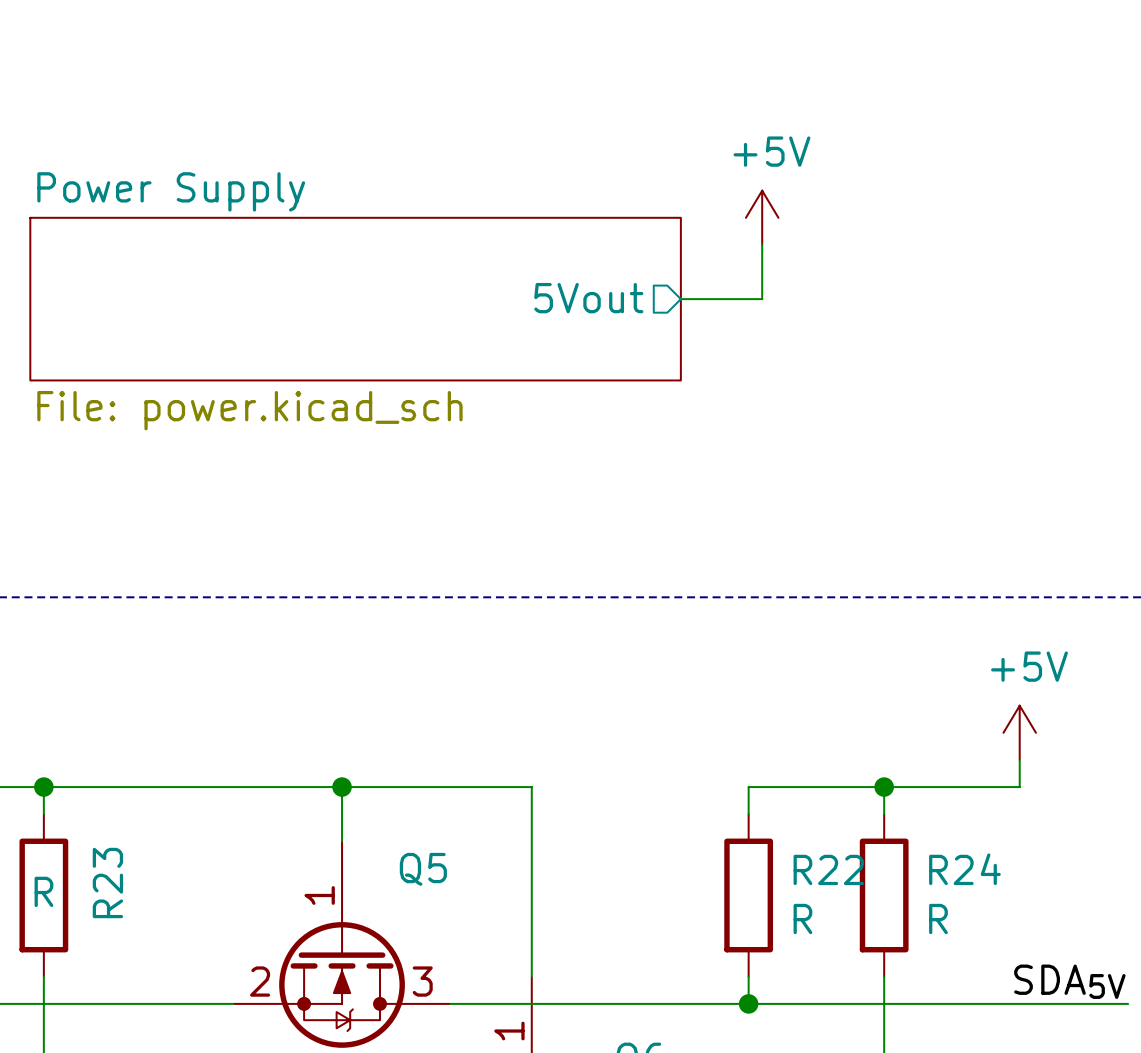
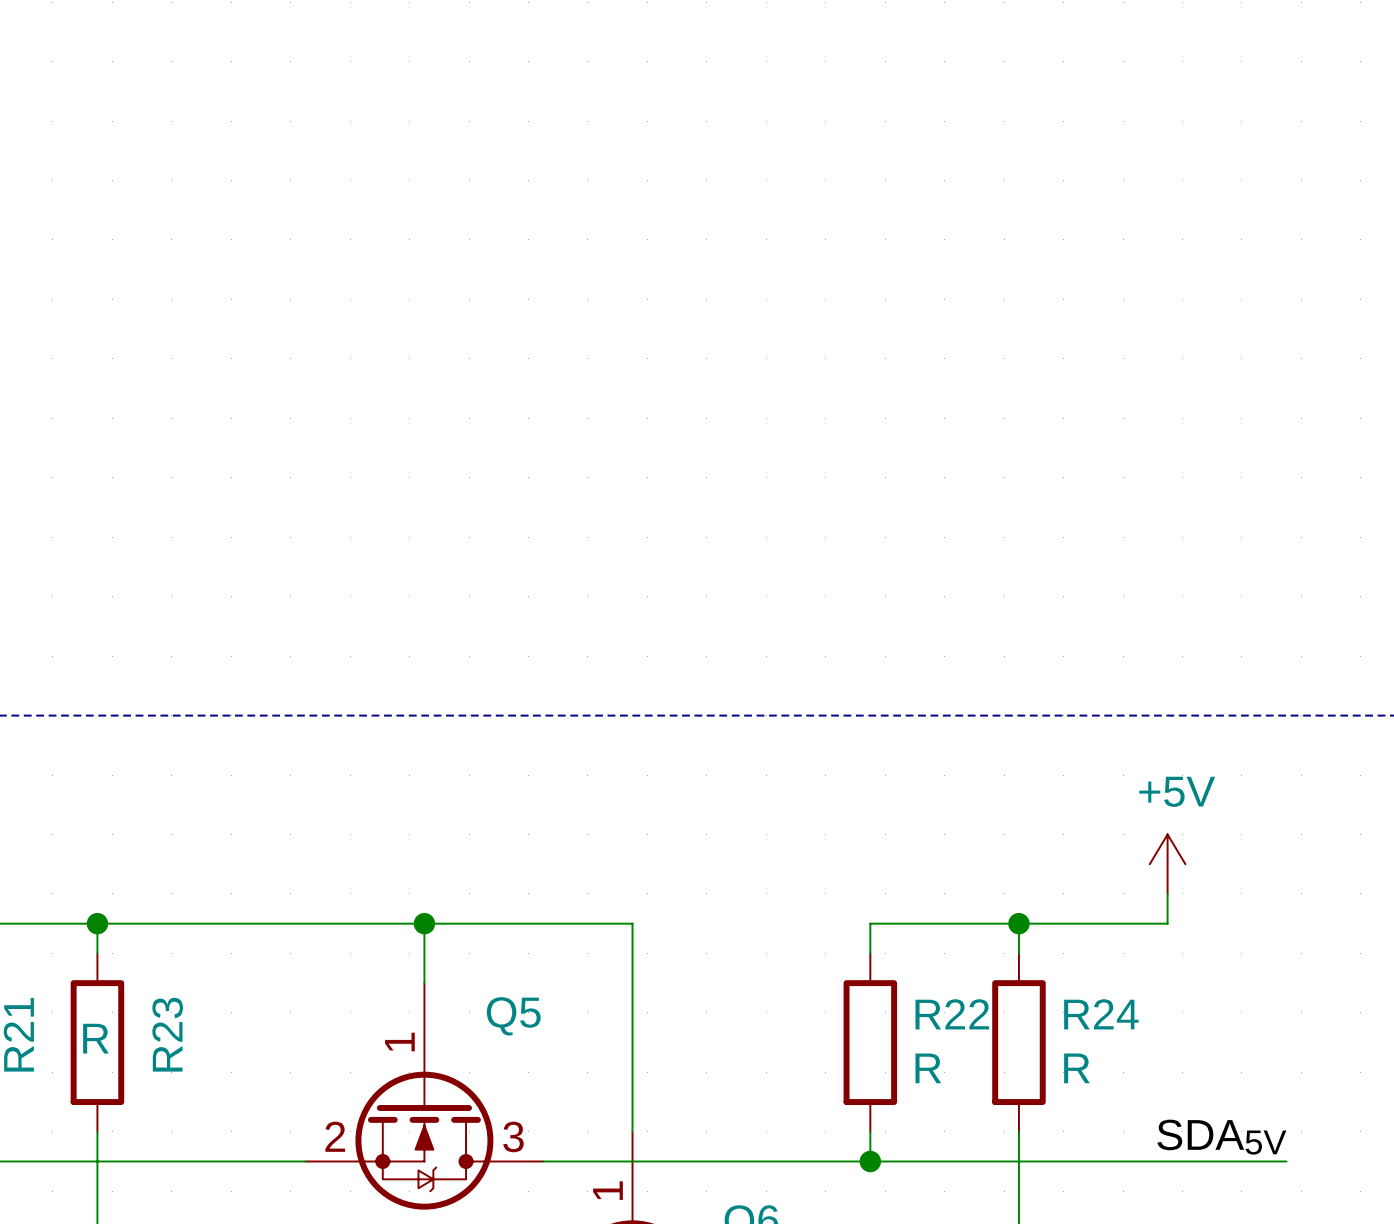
power symbol: +5V (762, 217) -> none
wire: (762, 244) (762, 299) (680, 299) -> none
sheet pin: 5Vout (588, 298) -> none
sheet Power Supply: File: power.kicad_sch (355, 299) -> none

